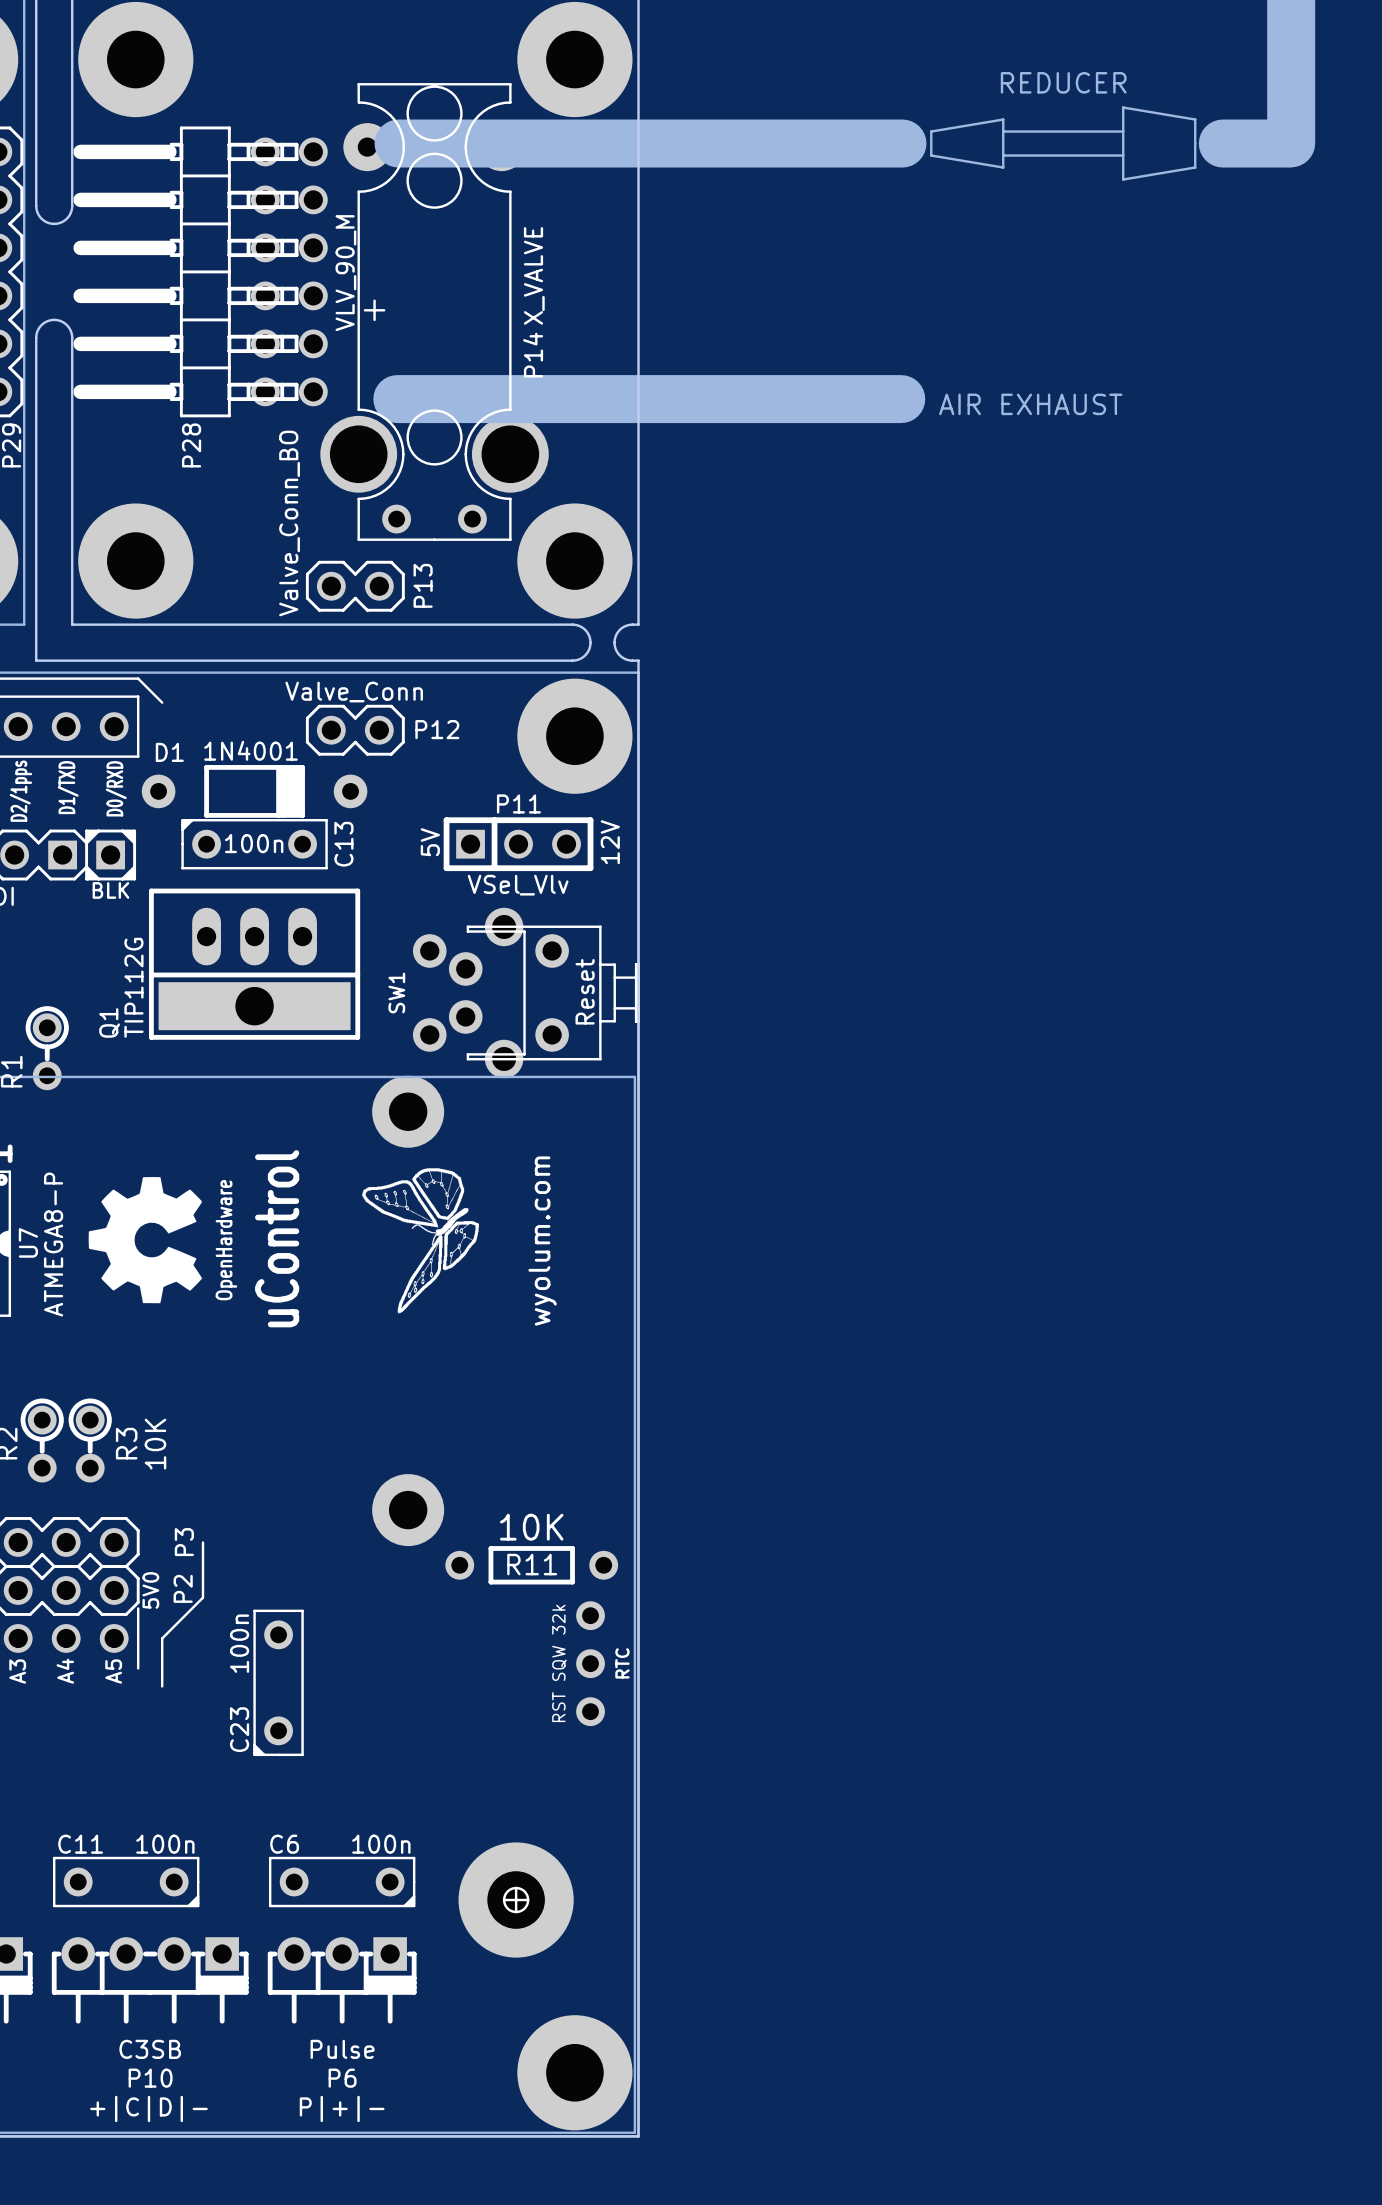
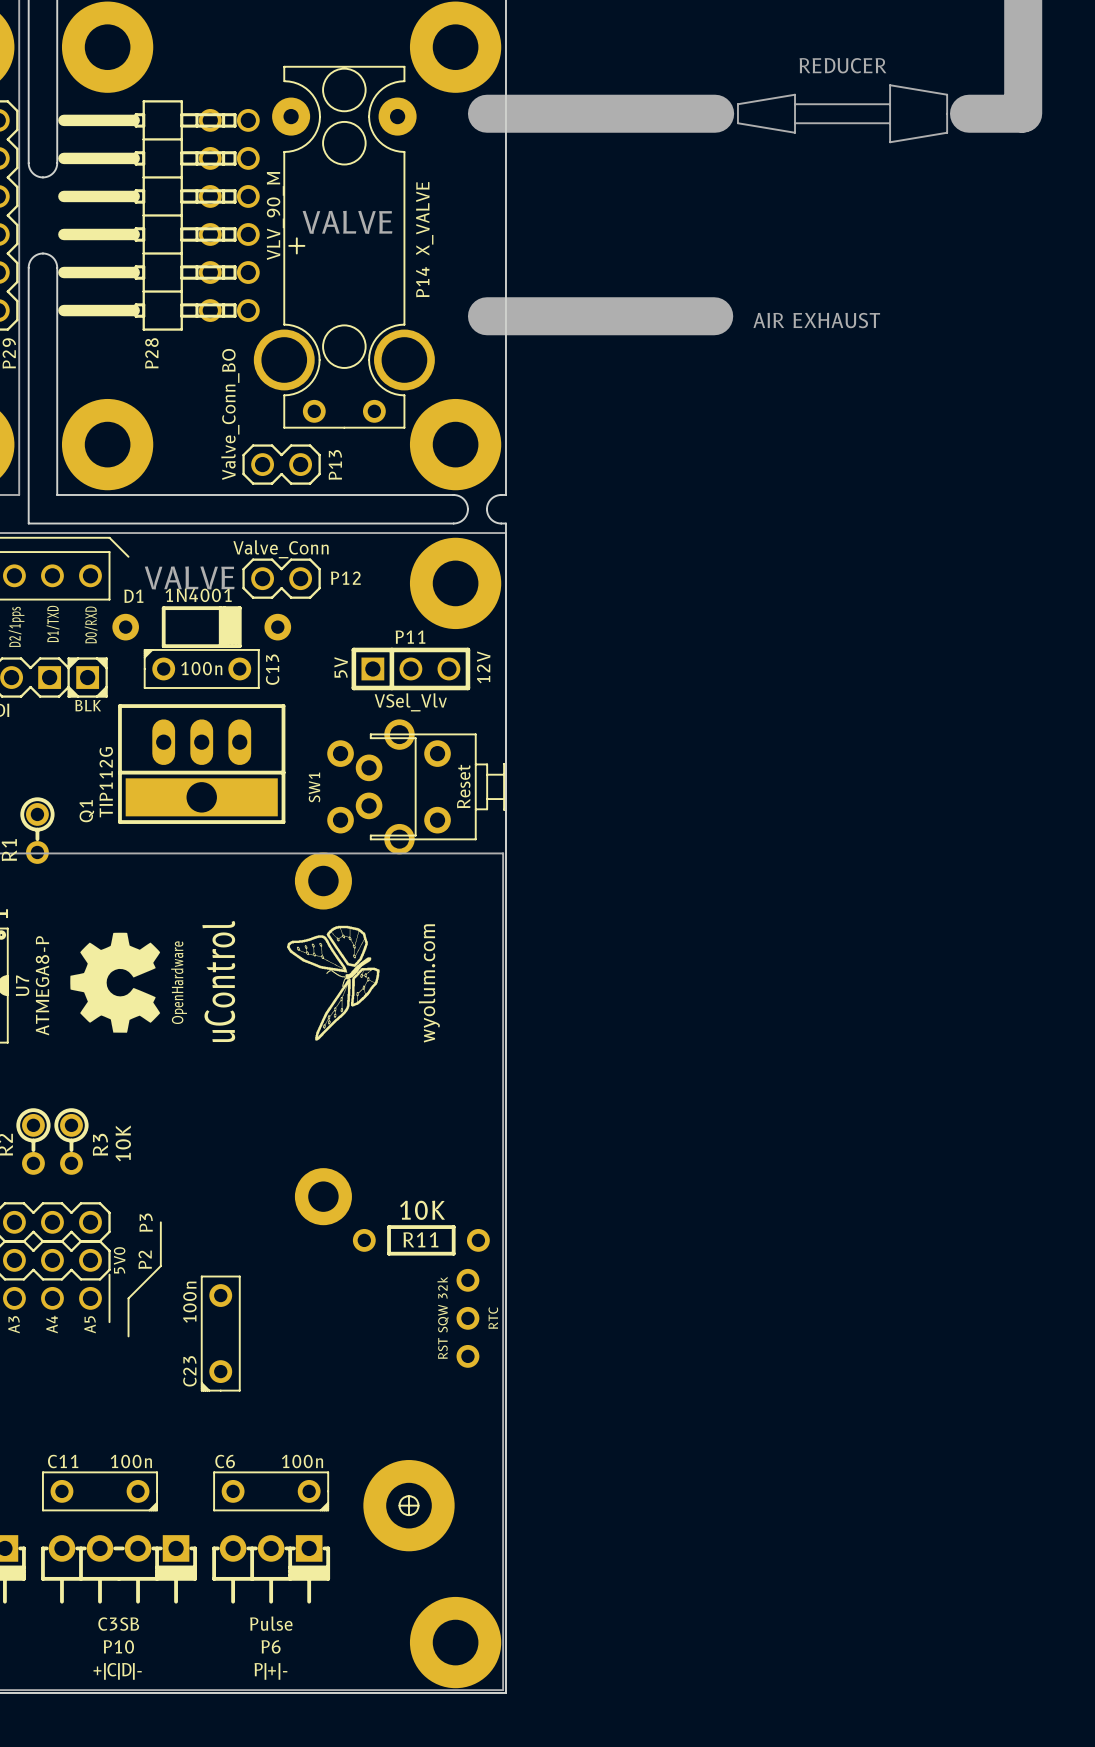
line: (398, 143) (614, 143) -> none
text: none -> VALVE (347, 222)
line: (397, 399) (614, 399) -> none
text: none -> VALVE (189, 577)

